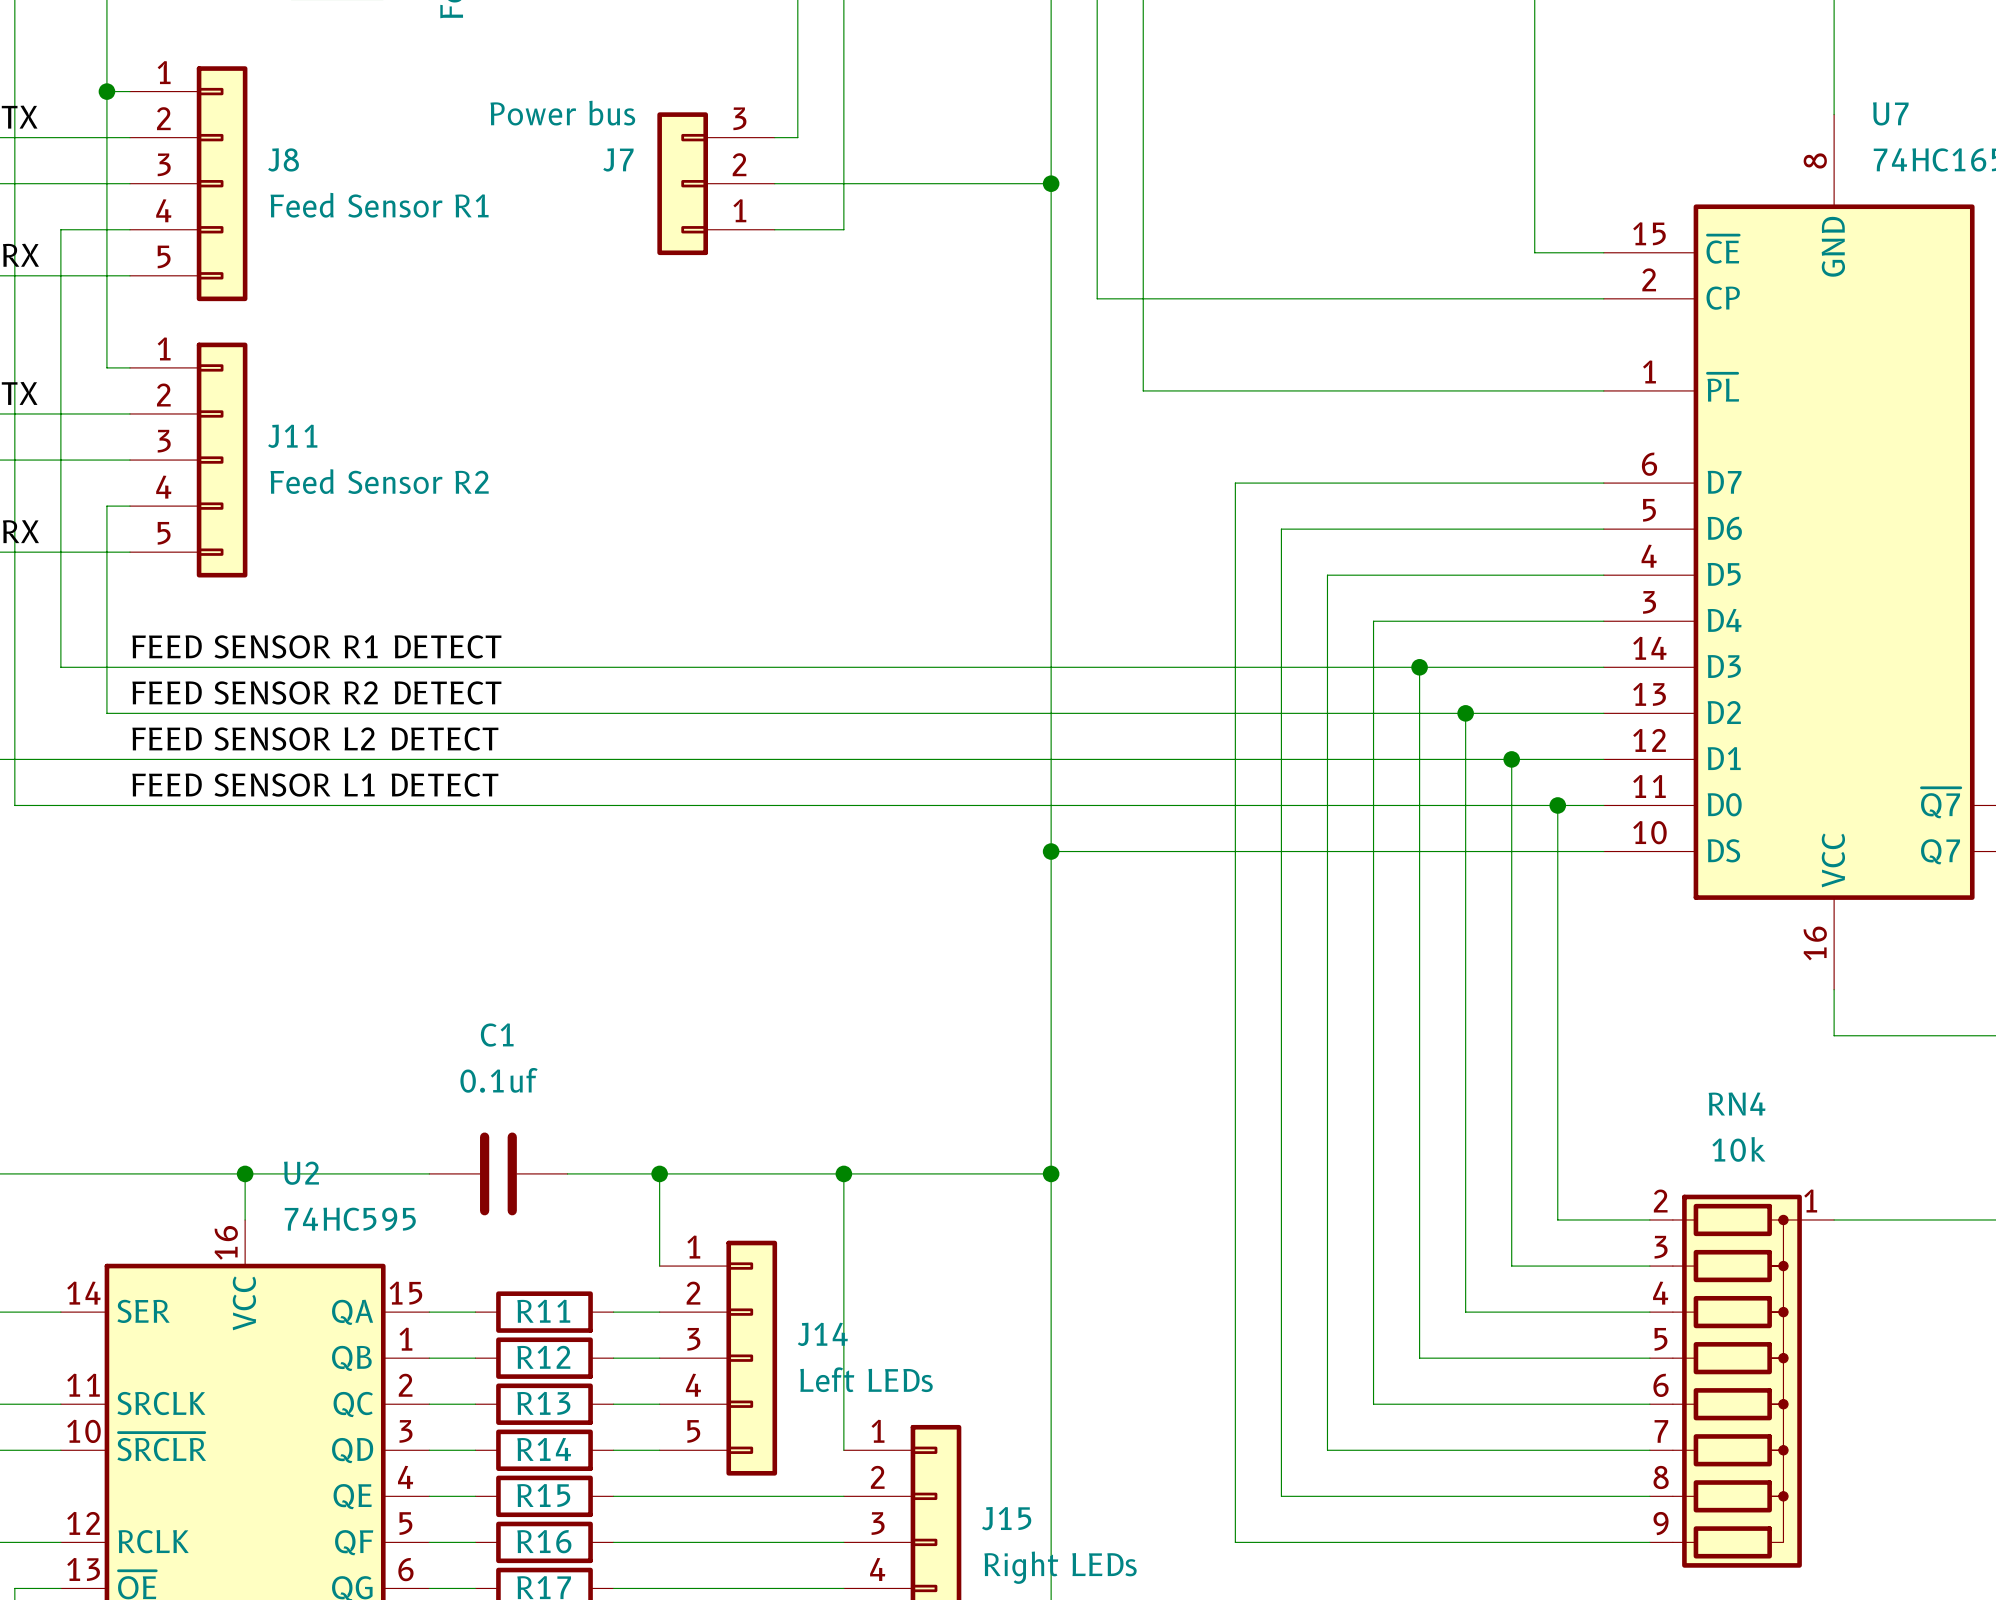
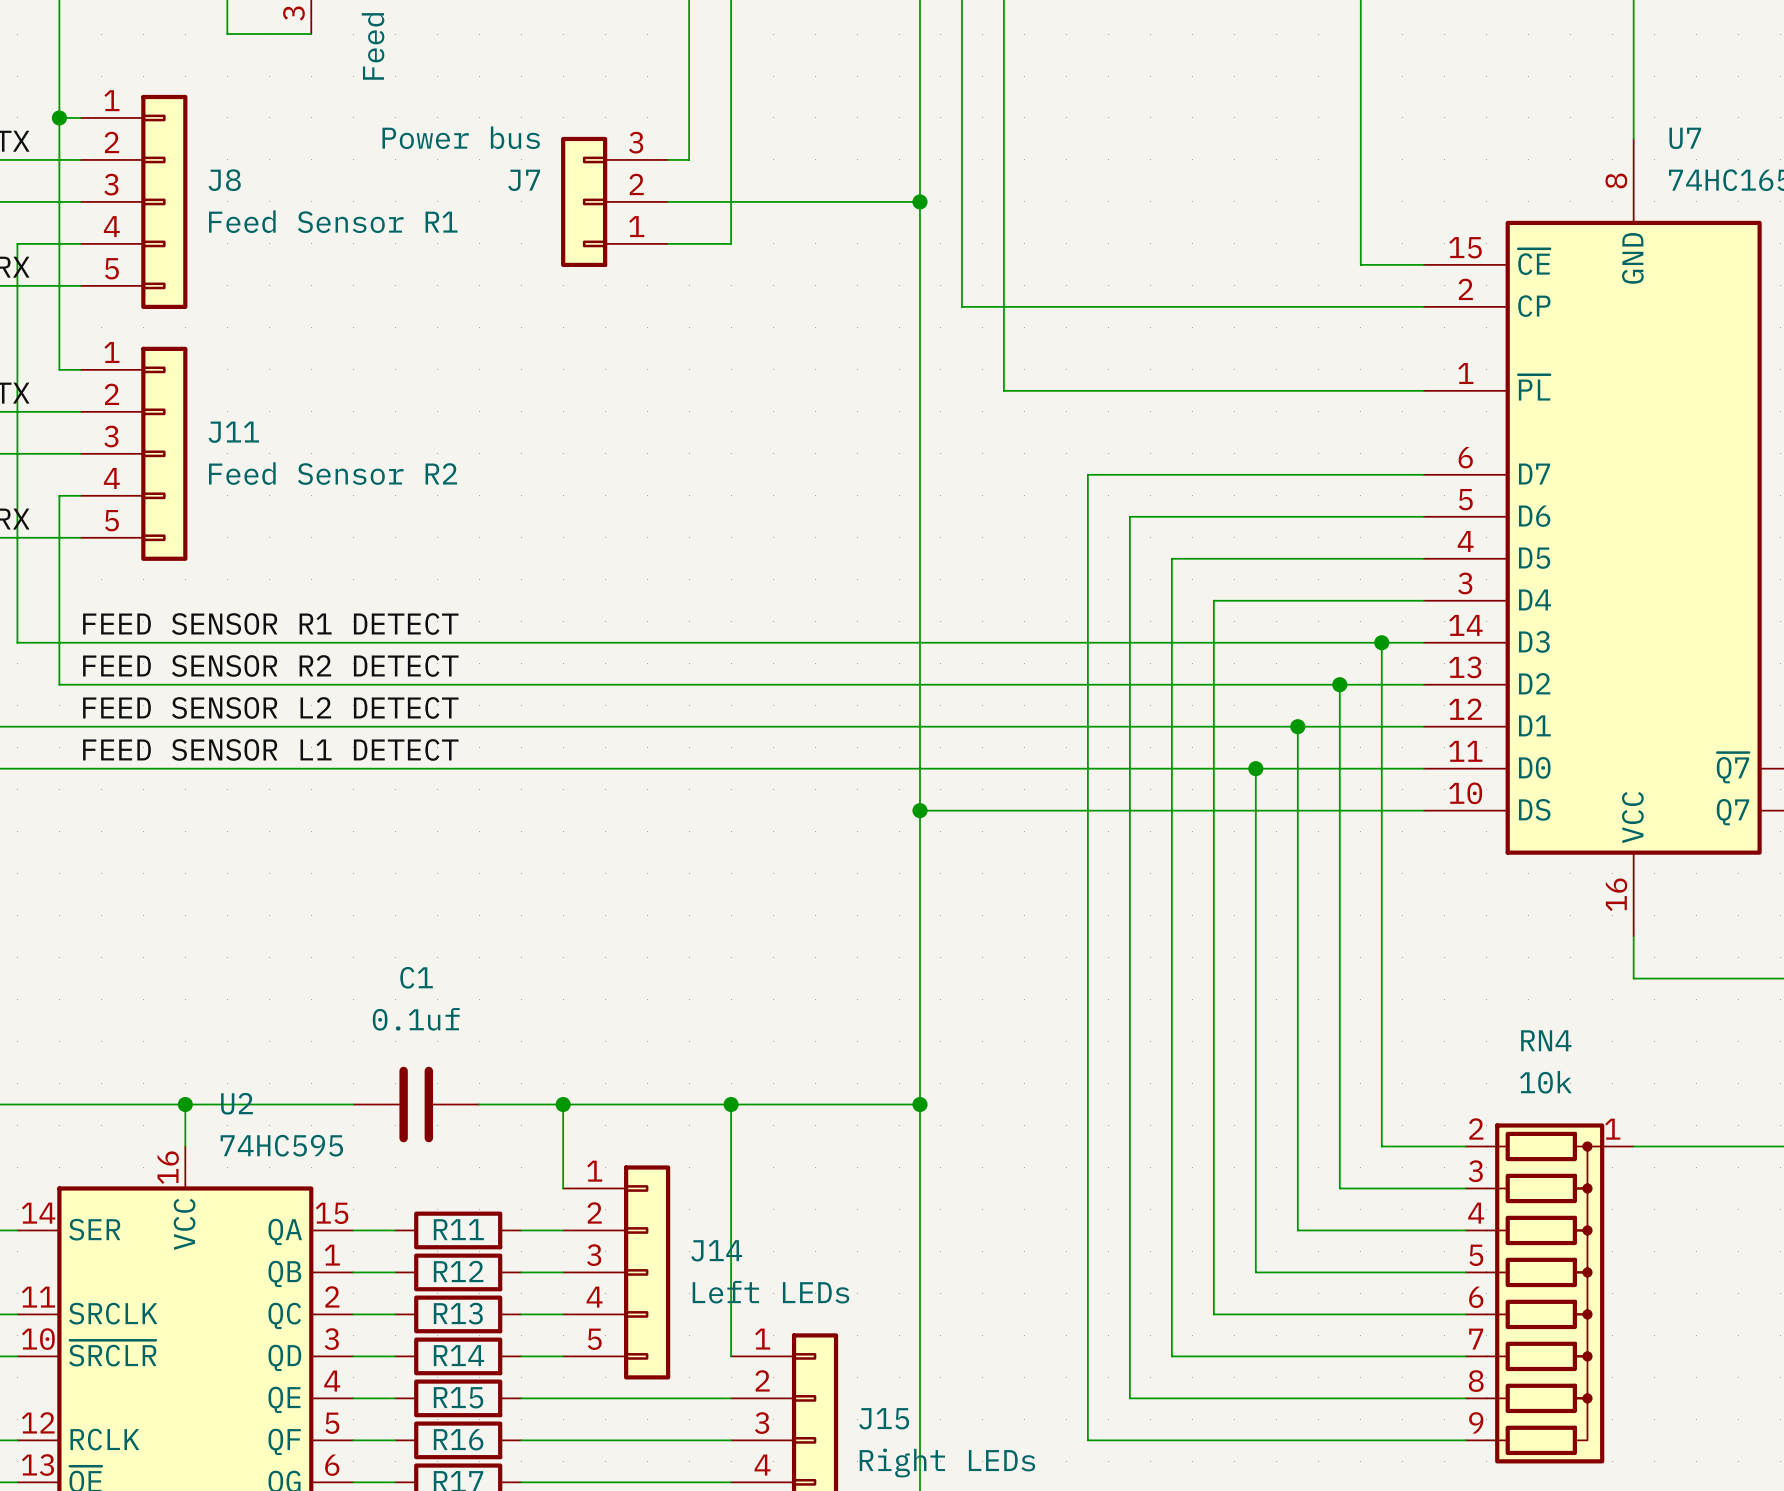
wire: (1419, 667) (1419, 805) -> (1381, 642) (1381, 768)
junction: (1419, 667) -> none
junction: none -> (1381, 642)
wire: (1465, 713) (1465, 759) -> (1339, 684) (1339, 726)
junction: (1465, 713) -> none
junction: none -> (1339, 684)
junction: none -> (1297, 726)
junction: (1511, 759) -> none
junction: none -> (1255, 768)
junction: (1557, 805) -> none

